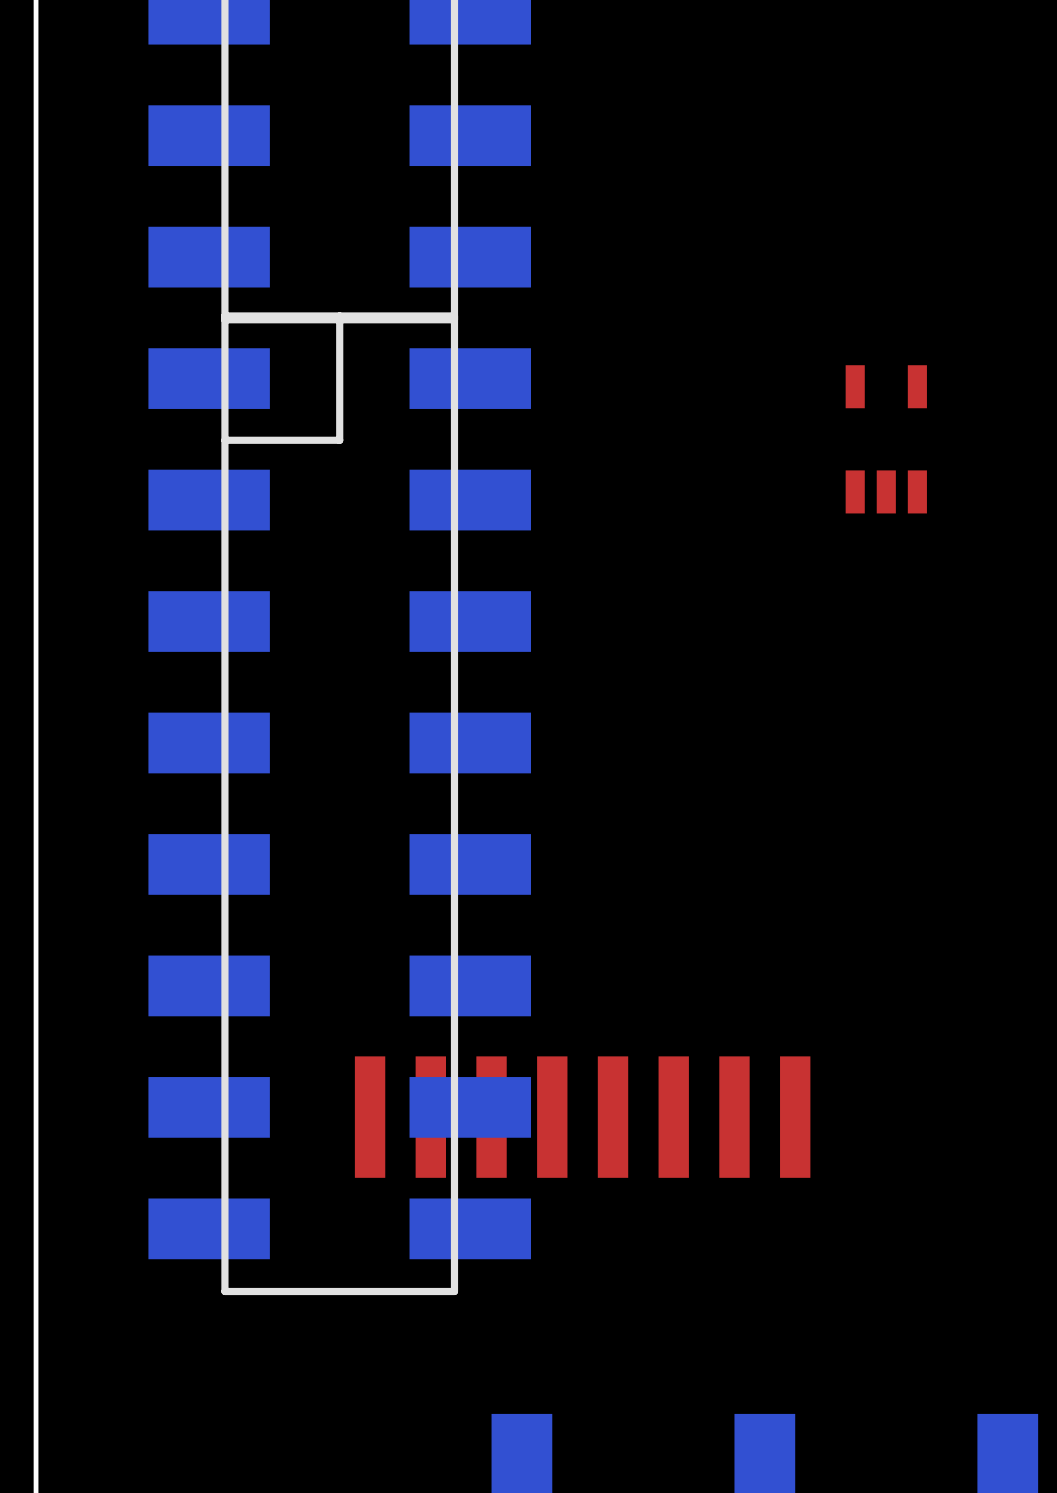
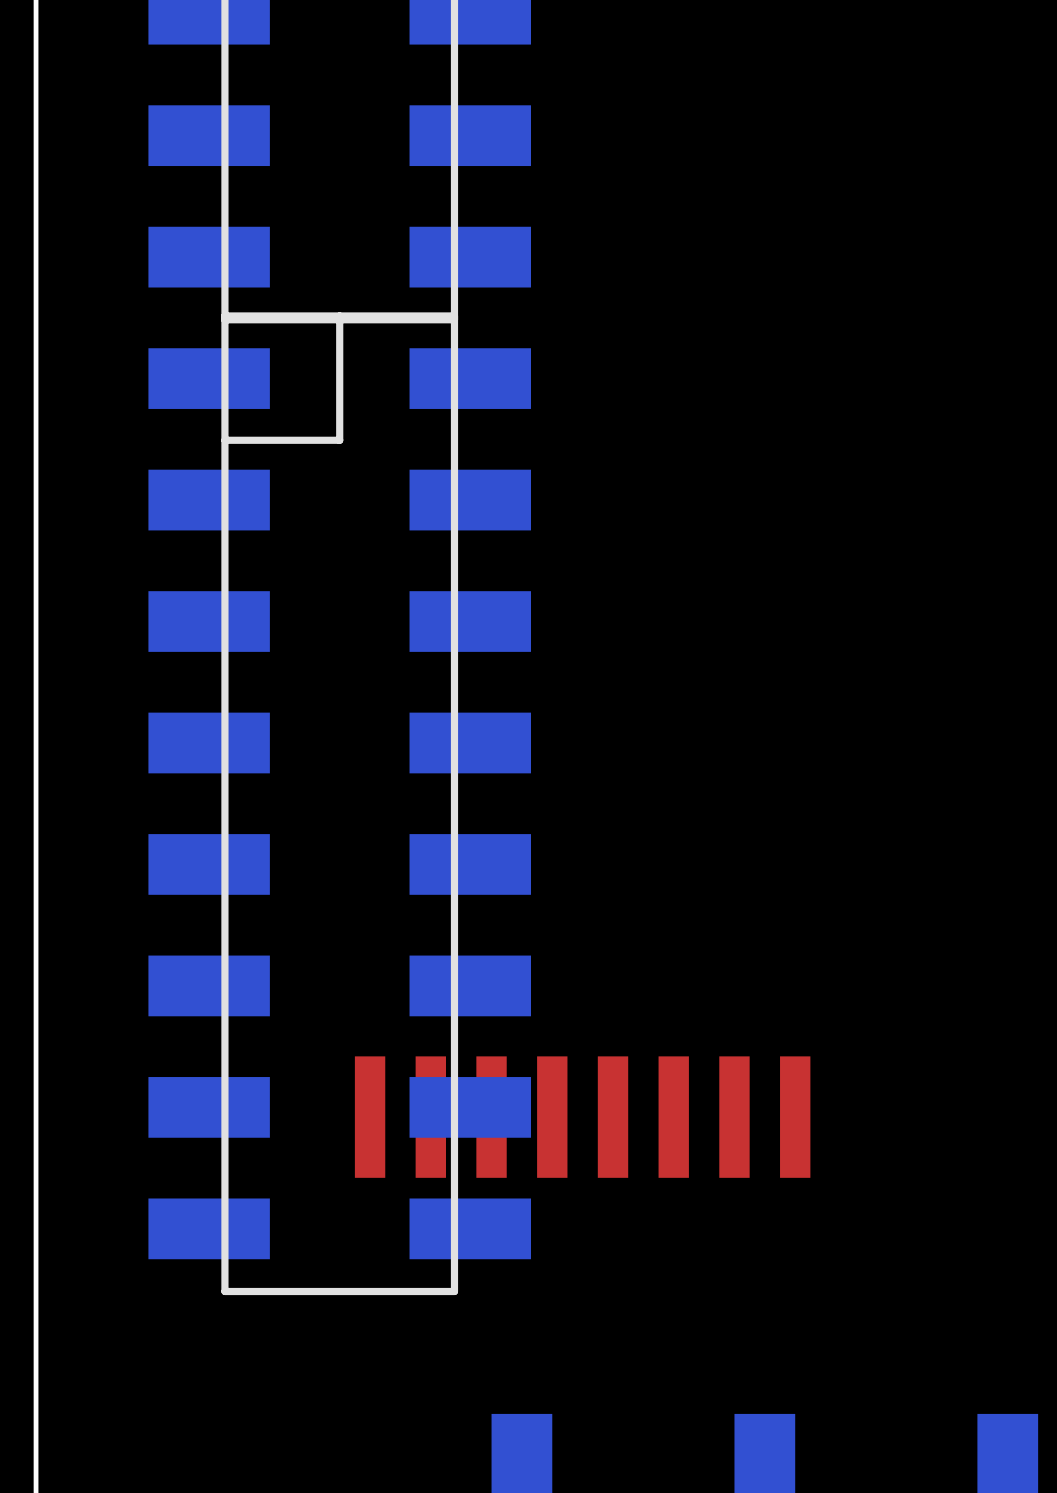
part: (886, 439) -> none

